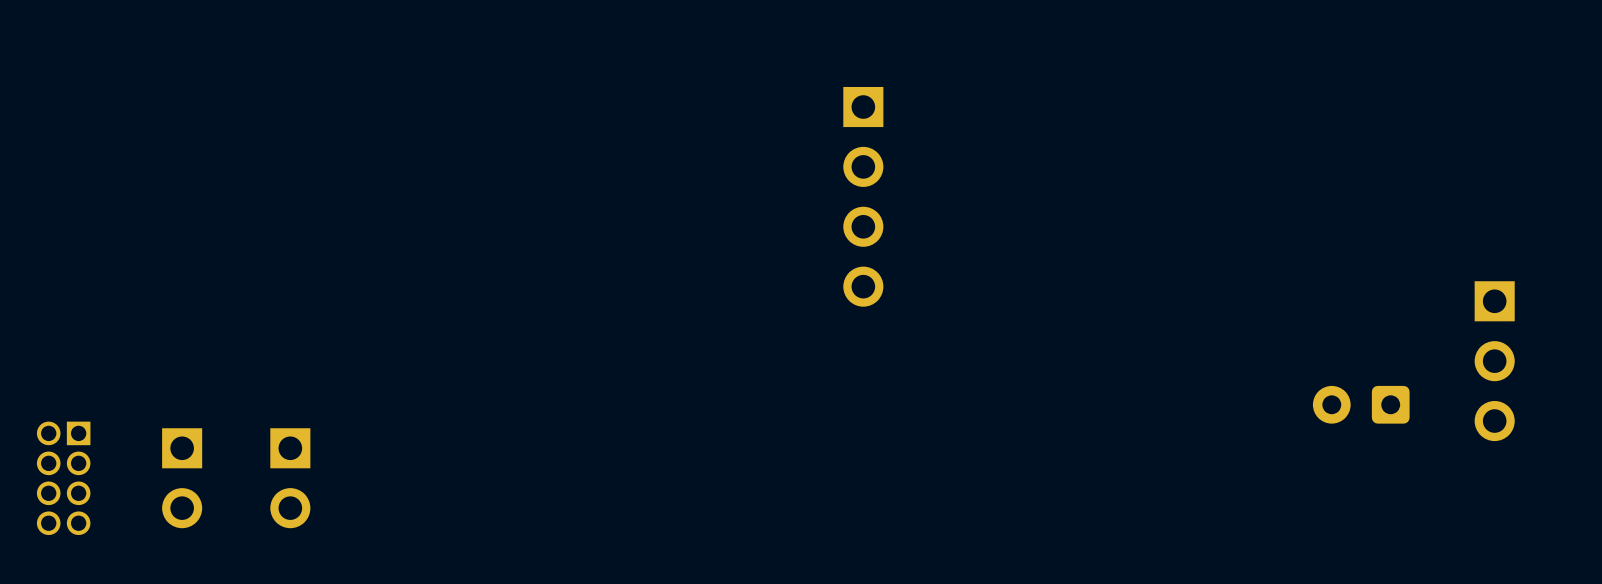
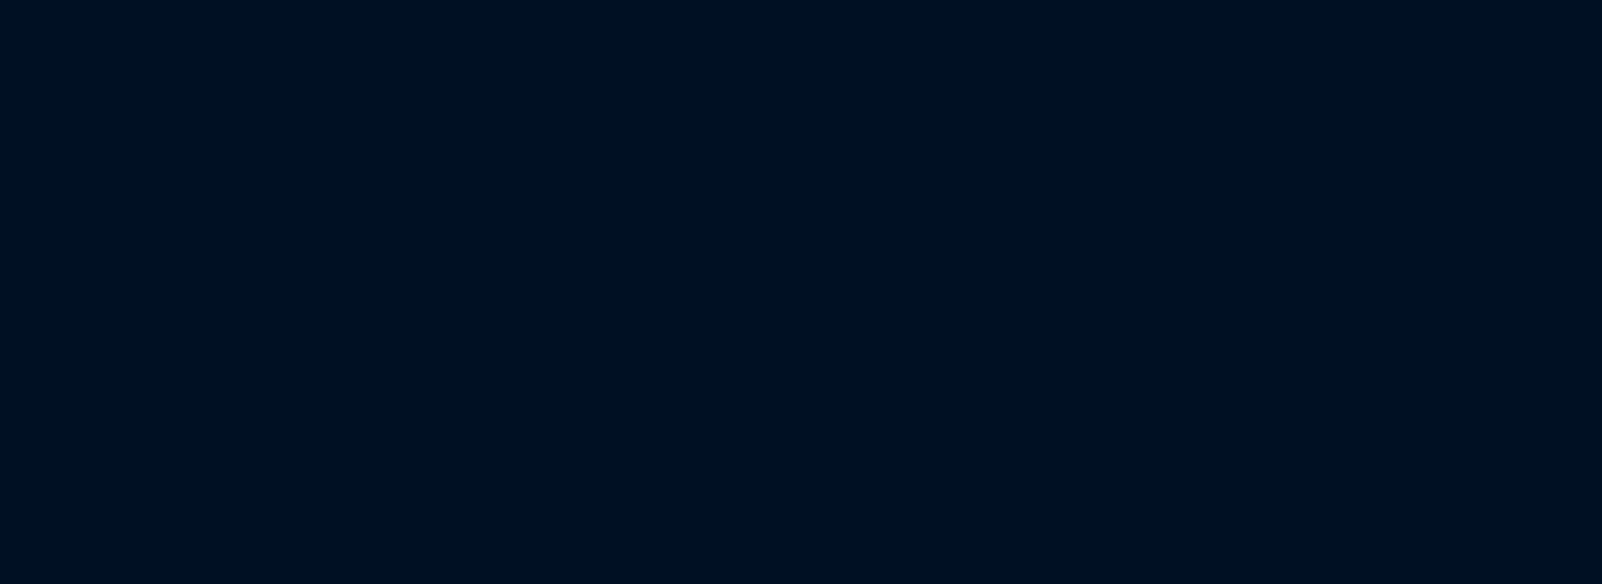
part: (863, 196) -> none
part: (1494, 361) -> none
part: (1361, 404) -> none
part: (63, 478) -> none
part: (182, 478) -> none
part: (290, 478) -> none

